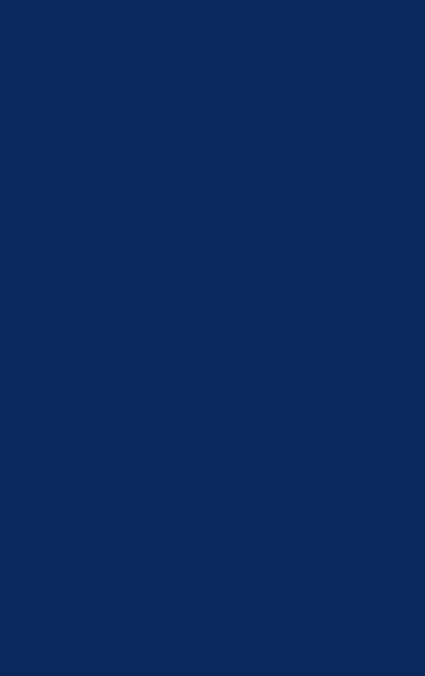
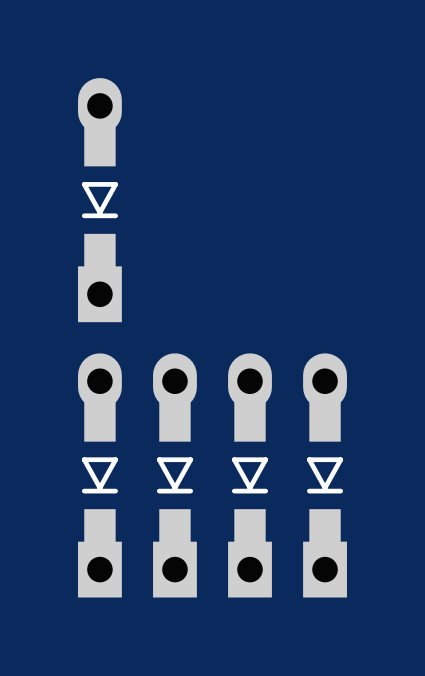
part: none -> (99, 200)
part: none -> (99, 475)
part: none -> (174, 475)
part: none -> (250, 475)
part: none -> (325, 475)

